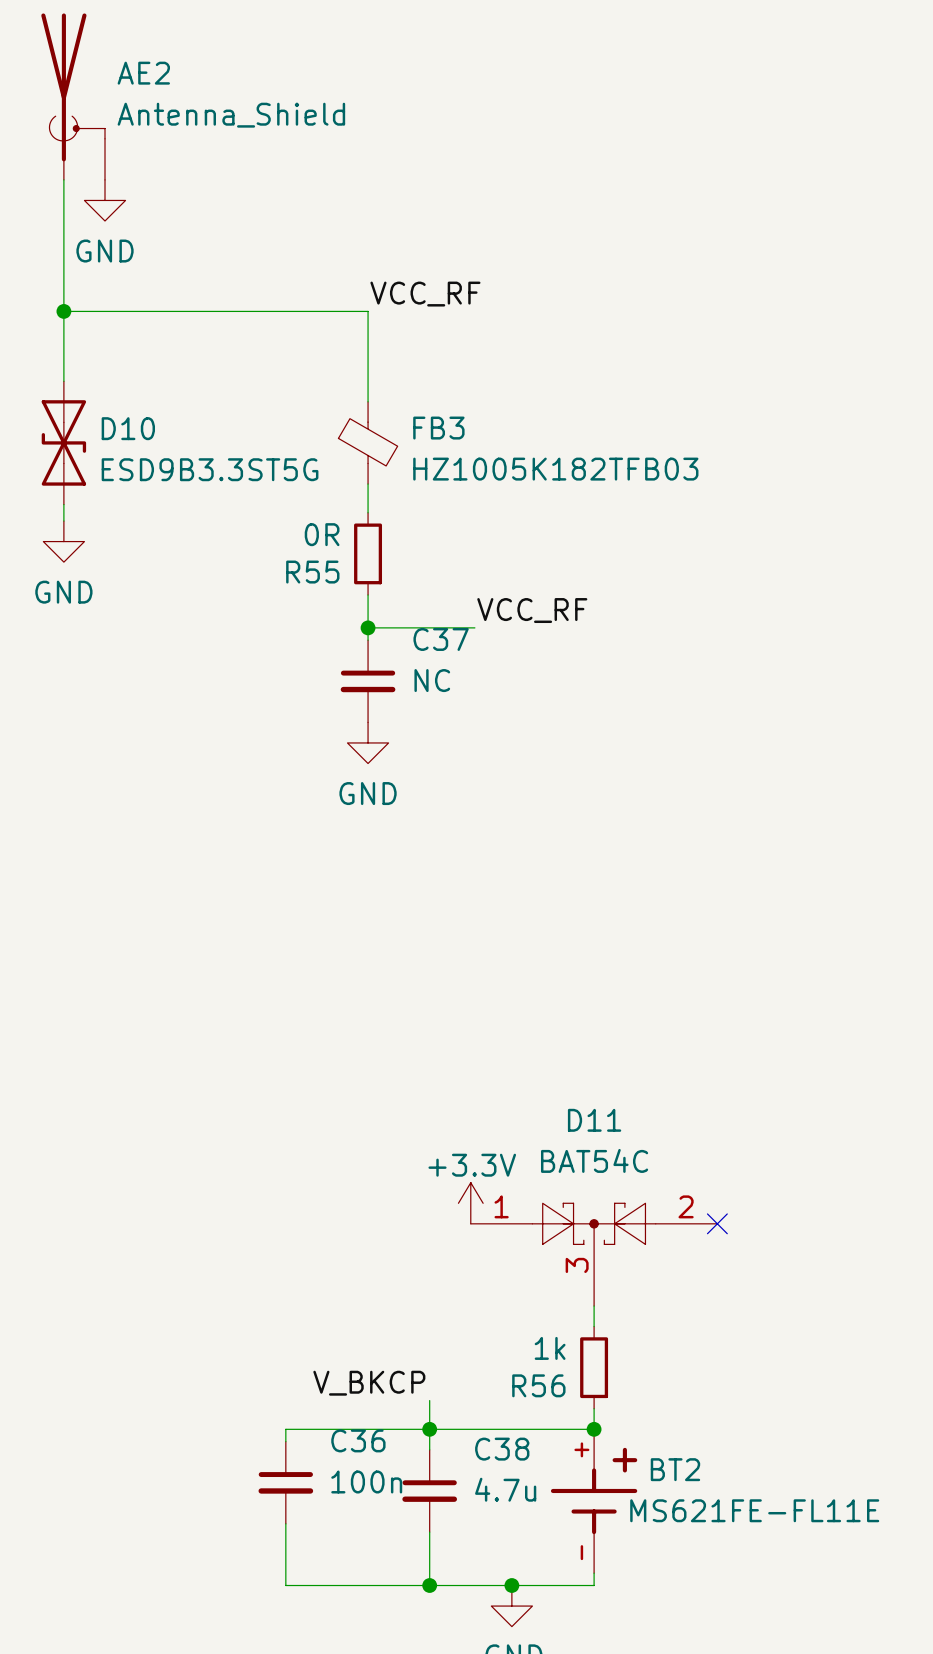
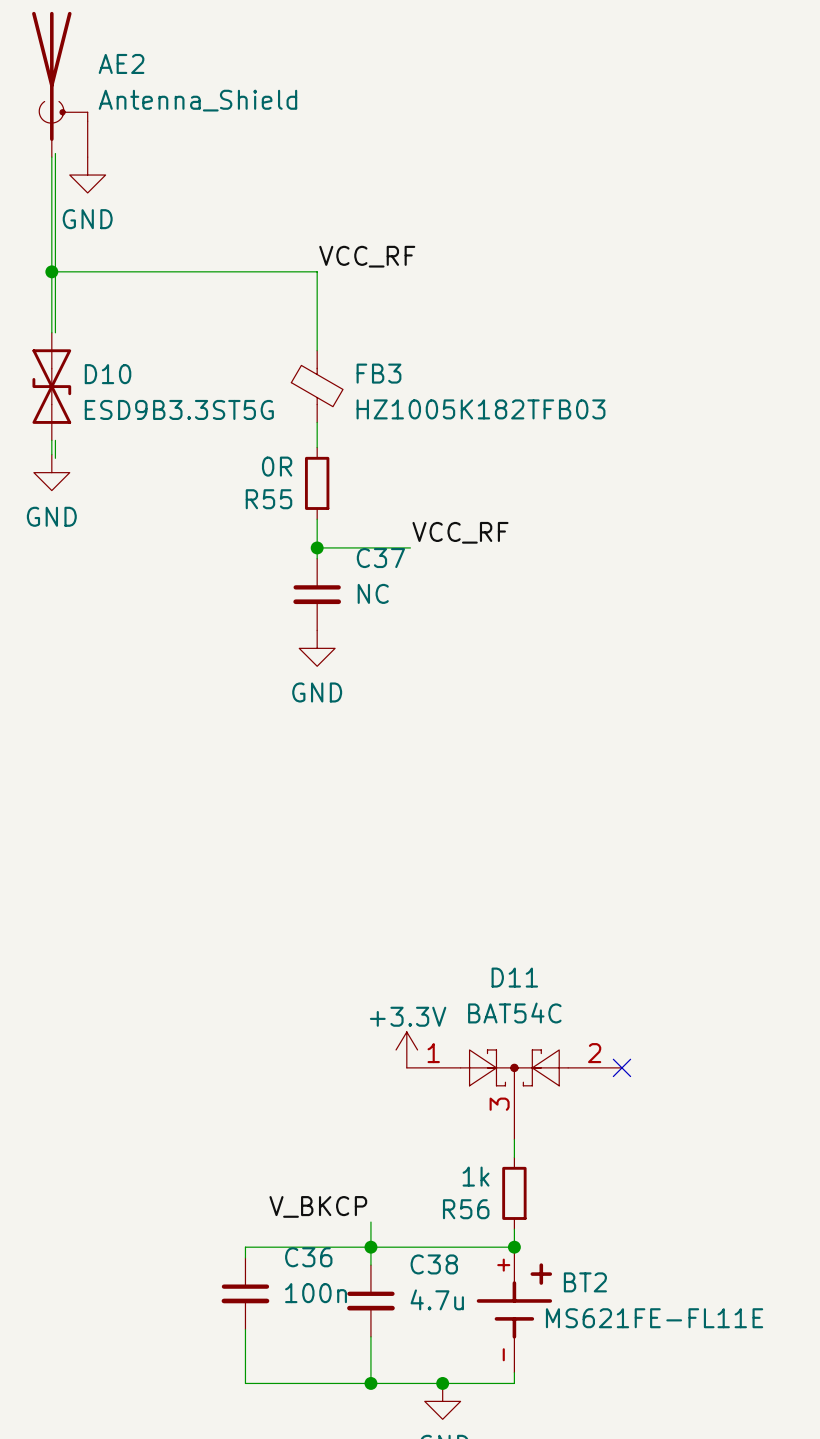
wire: none -> (55, 153) (55, 332)
wire: none -> (55, 440) (55, 458)

